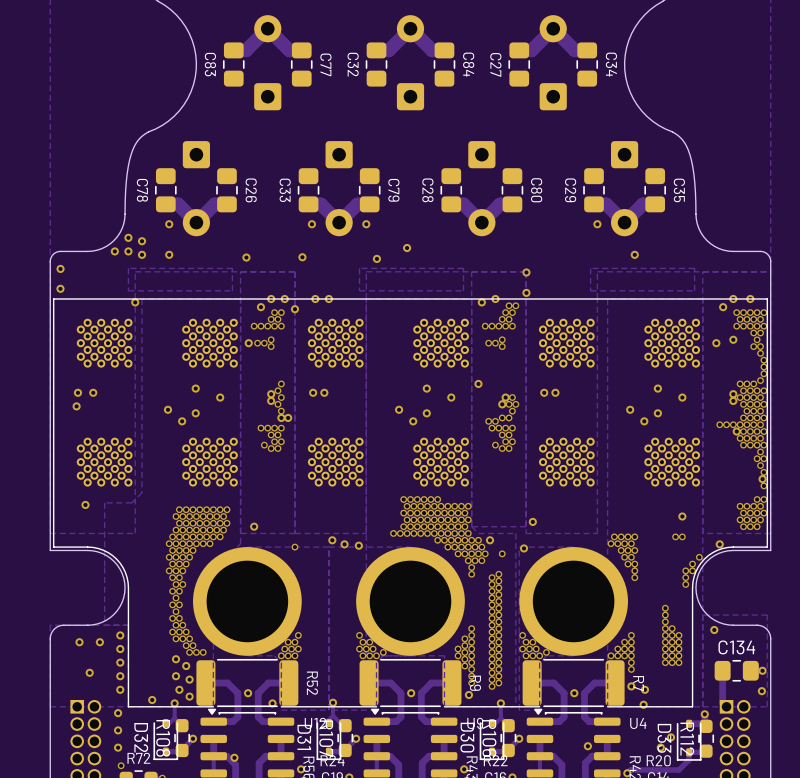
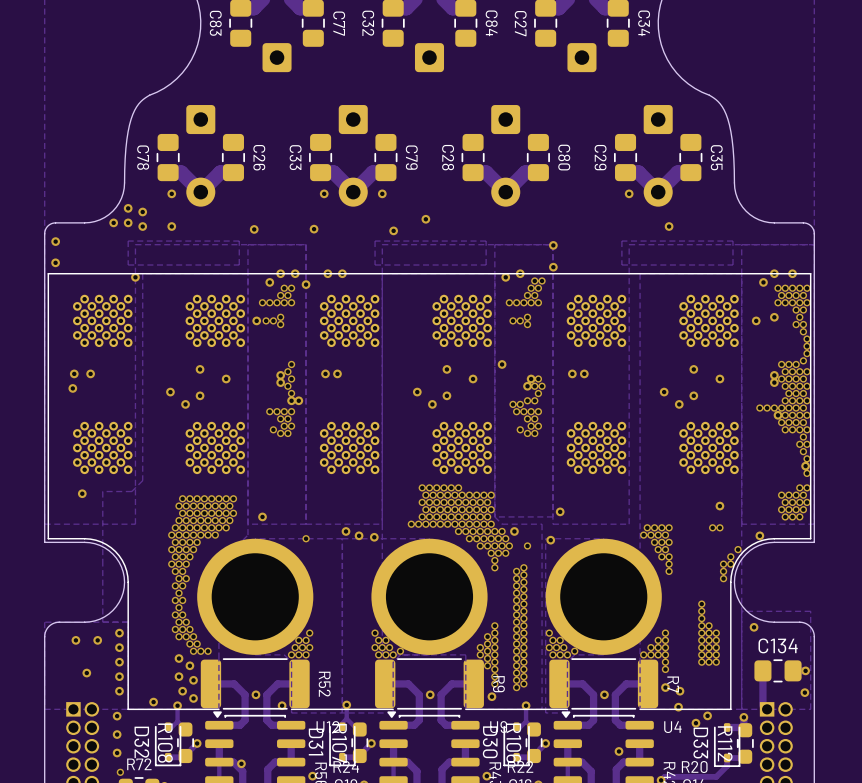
via: none -> (707, 715)
via: none -> (695, 723)
via: (670, 737) -> none
via: (660, 747) -> none

